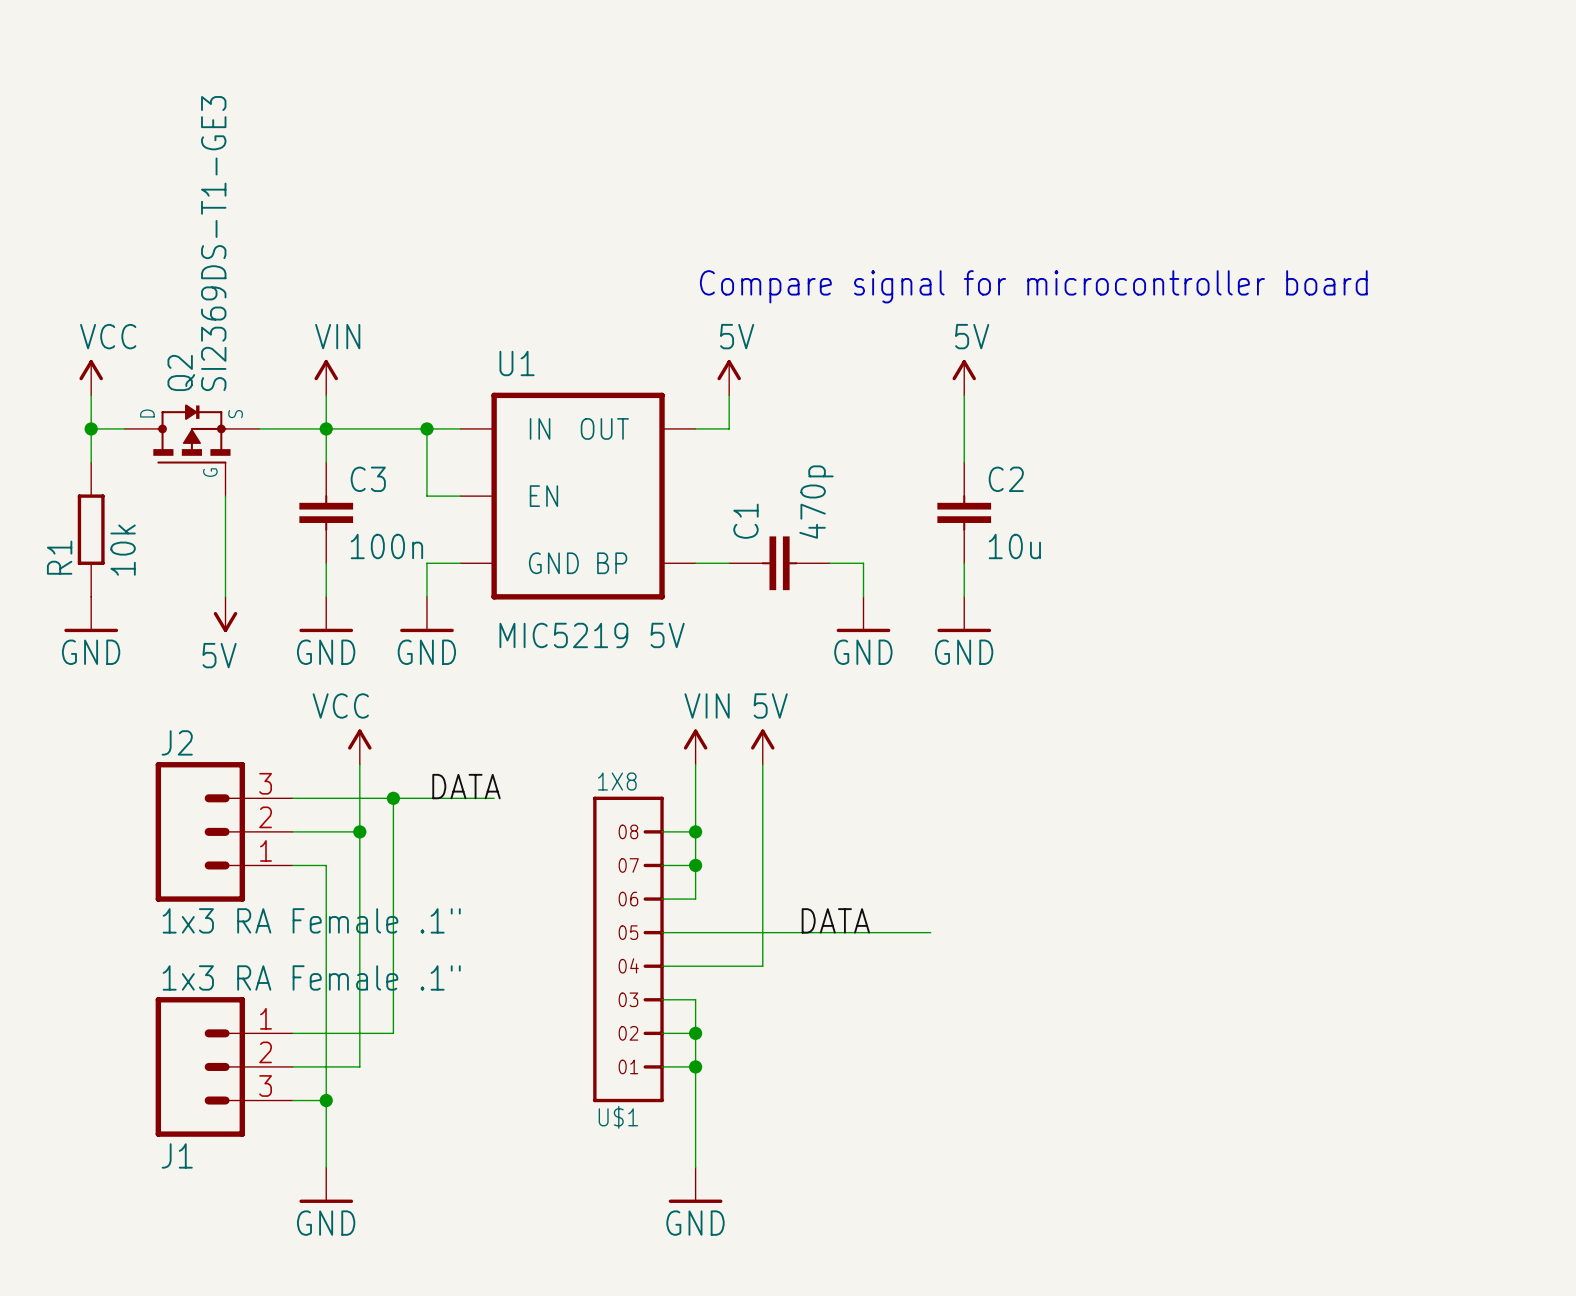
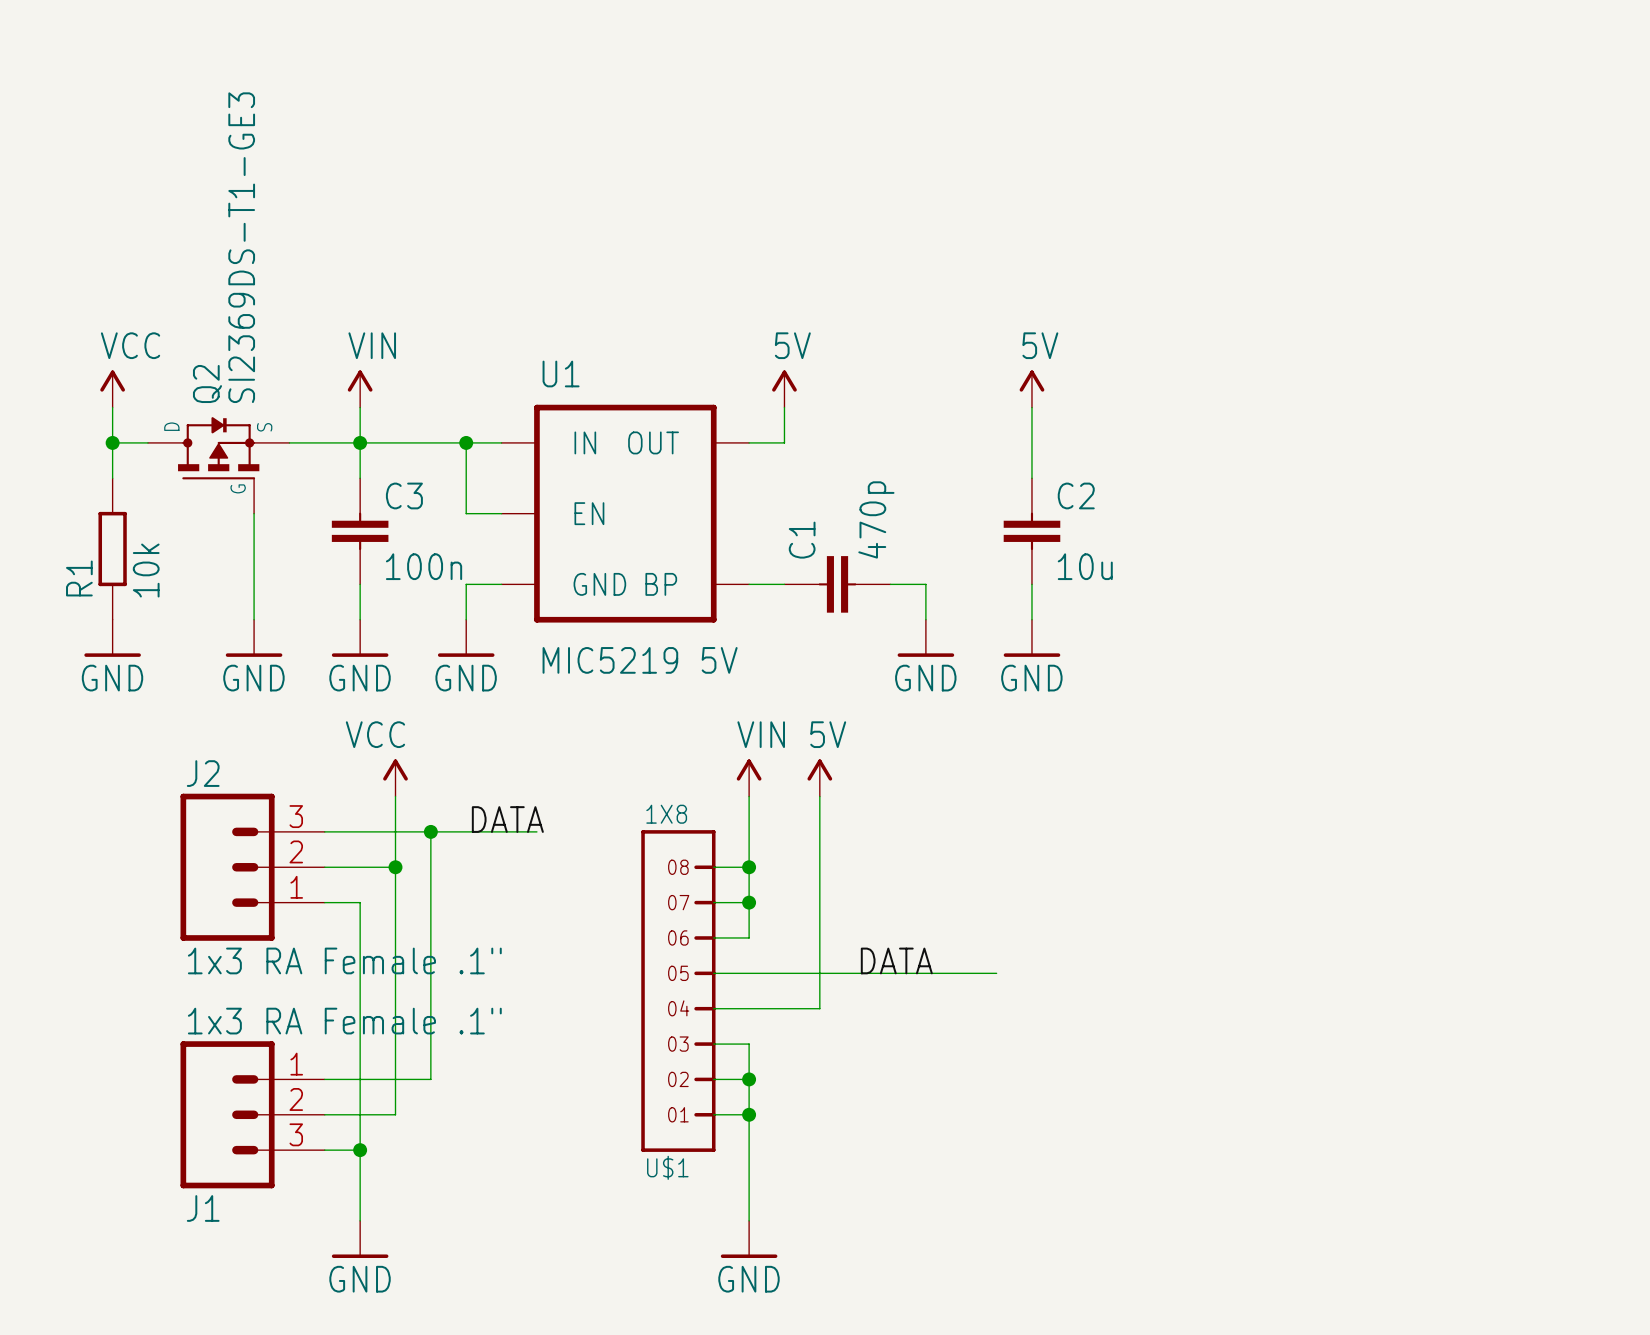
text: Compare signal for microcontroller board (1033, 286) -> none
power symbol: 5V (225, 614) -> GND (254, 638)

